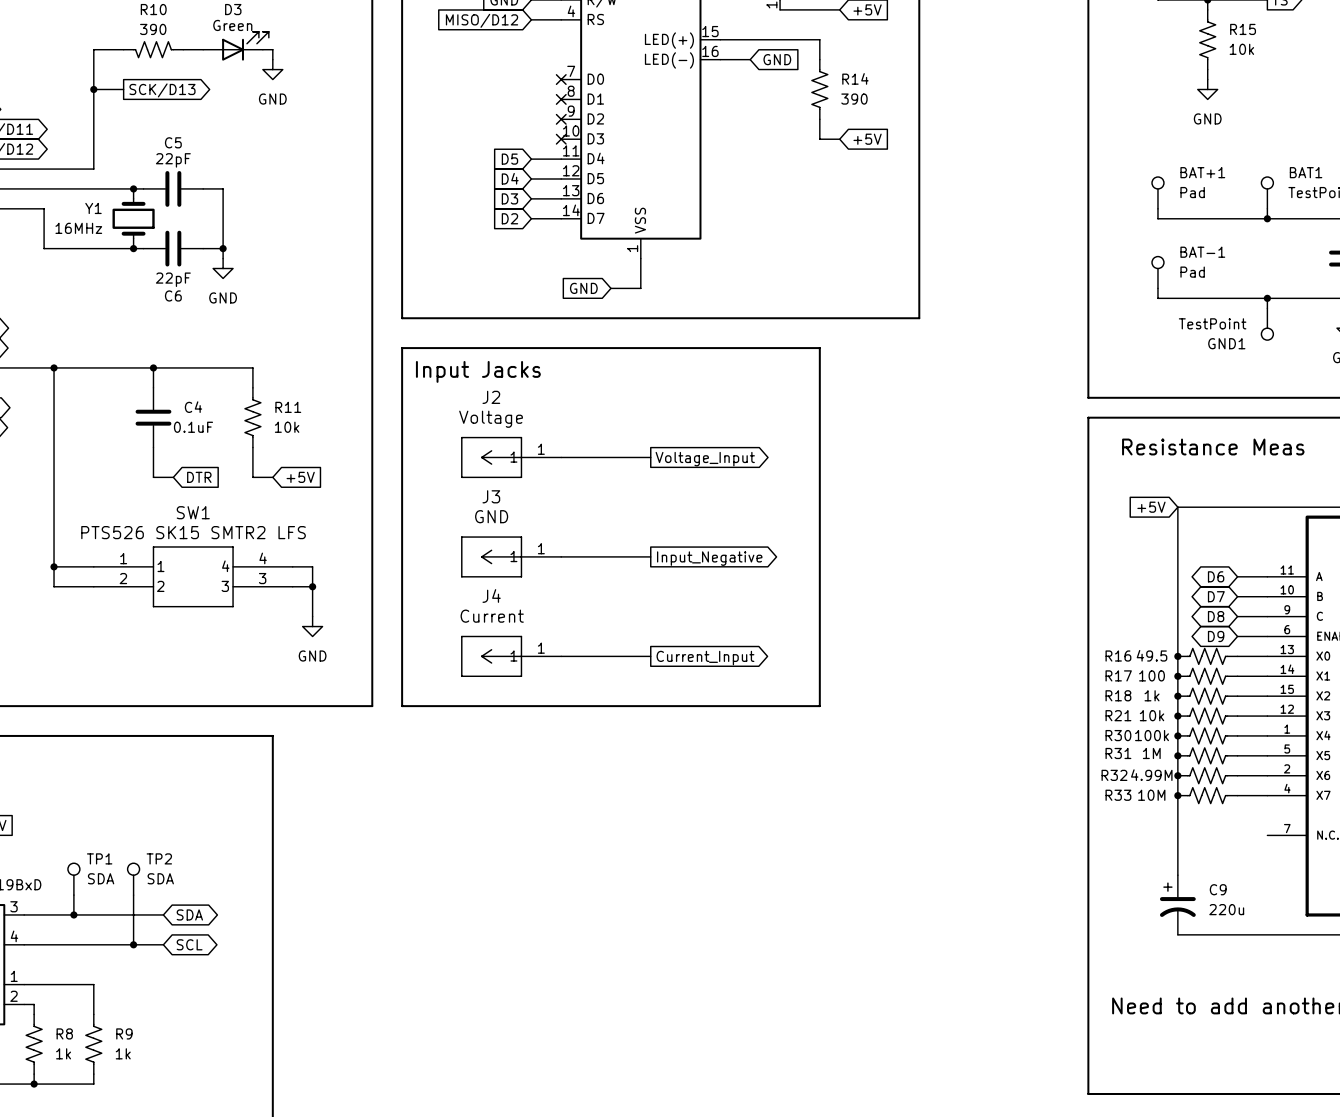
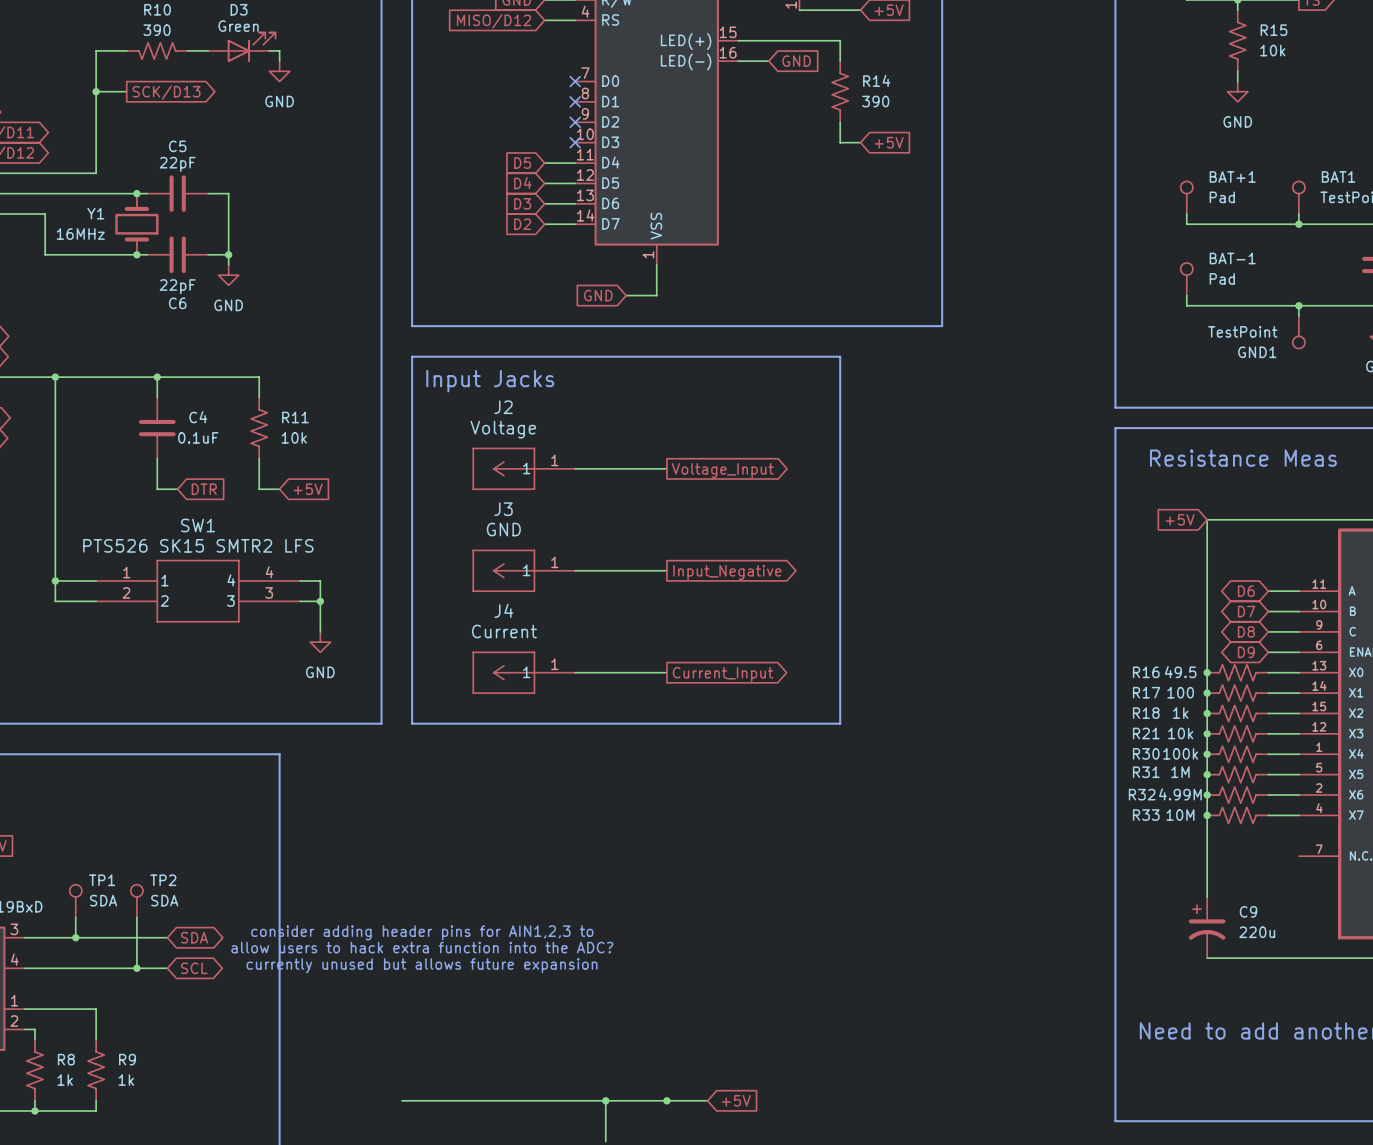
text: none -> consider adding header pins for AIN1,2,3 to (422, 932)
text: none -> allow users to hack extra function into the ADC? (422, 947)
text: none -> currently unused but allows future expansion (422, 965)
wire: none -> (401, 1100) (707, 1100)
wire: none -> (605, 1100) (605, 1141)
junction: none -> (605, 1100)
junction: none -> (666, 1100)
global label: none -> +5V (736, 1100)

